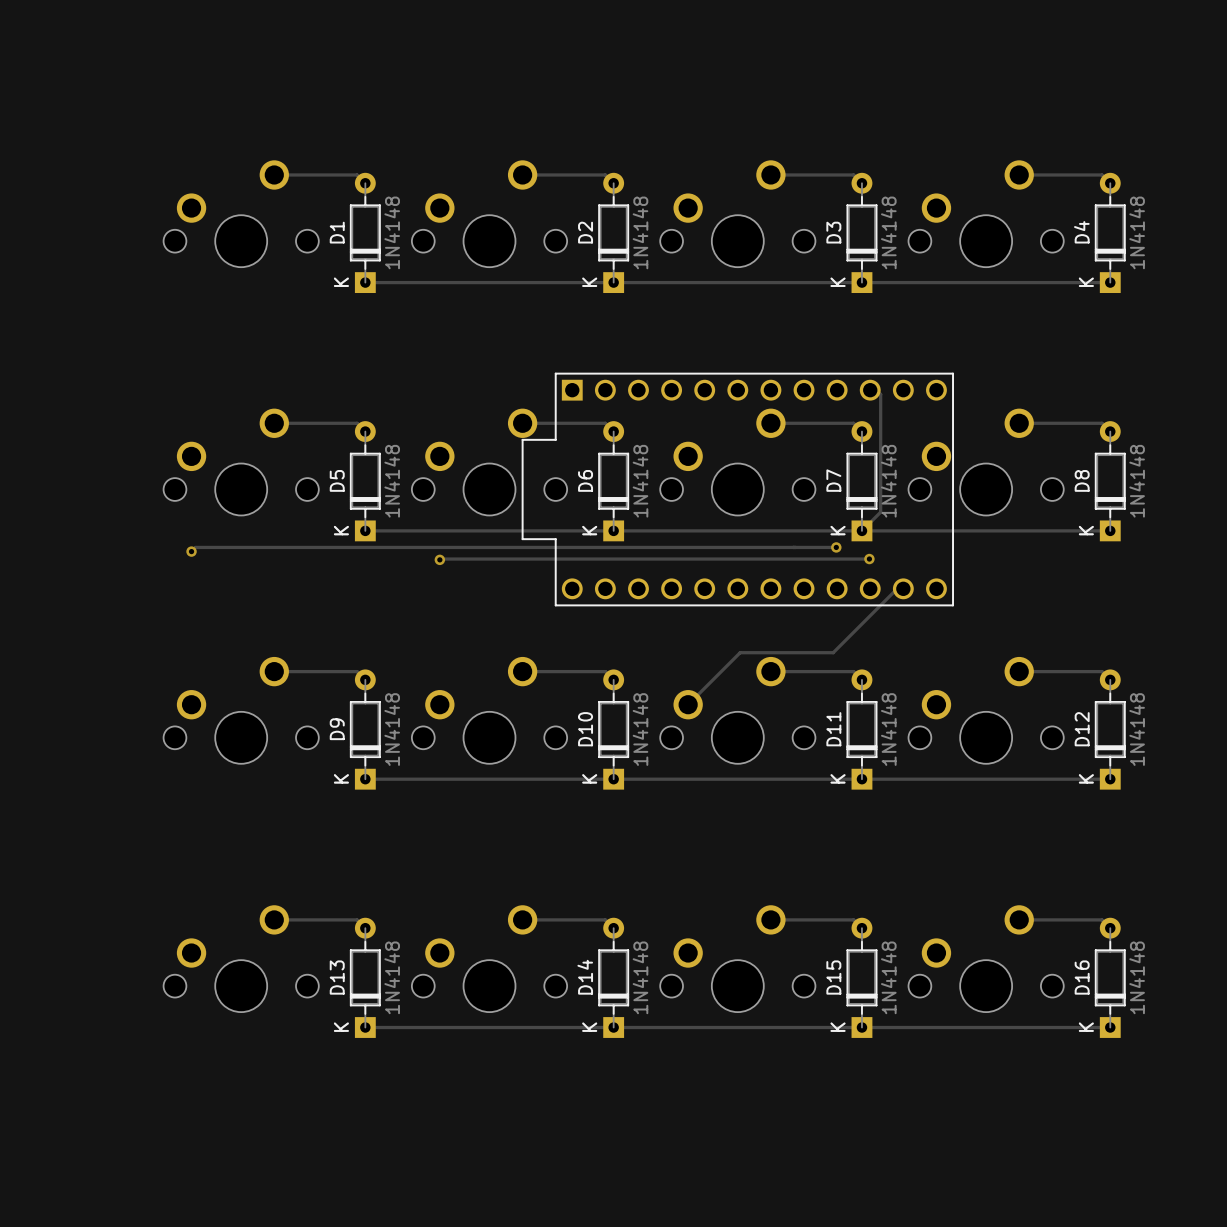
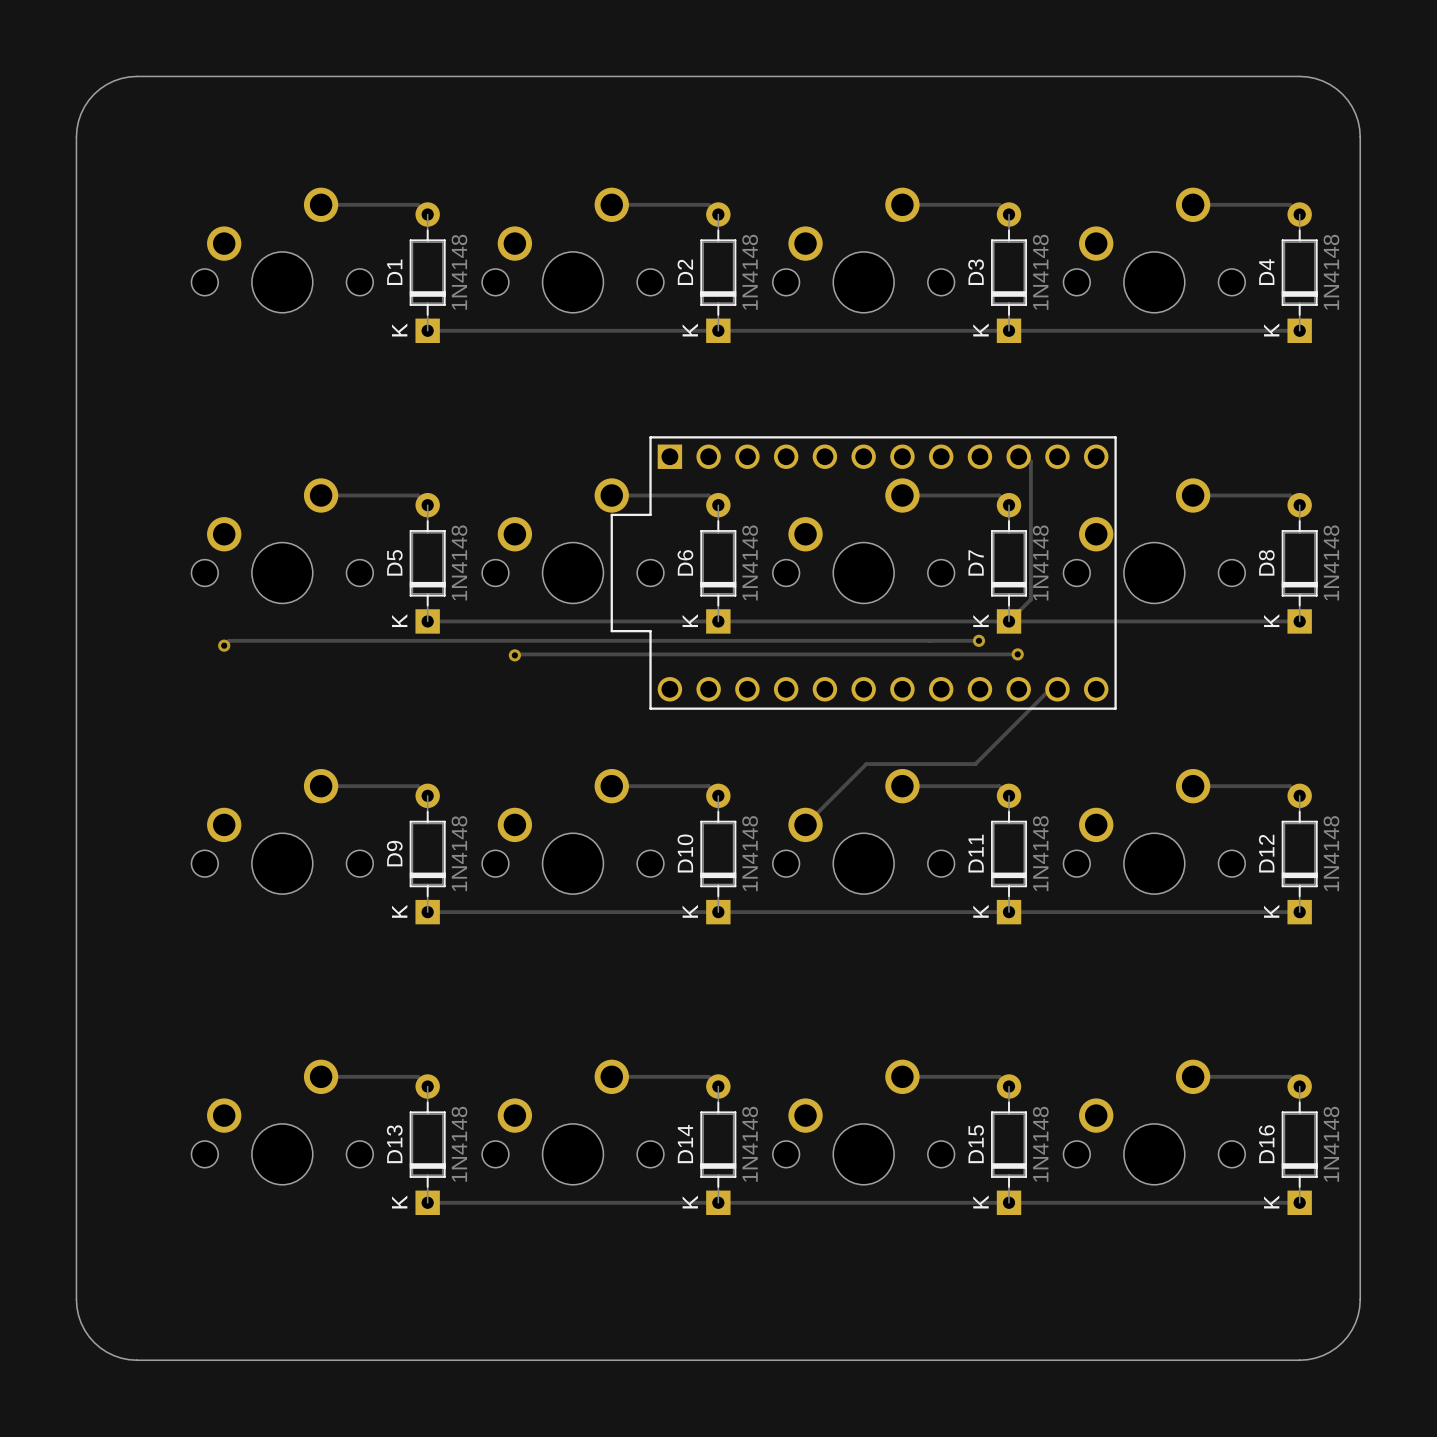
board edge: none -> (137, 76) (1299, 76) (1322, 81) (1342, 94) (1355, 113) (1360, 137) (1360, 1299) (1355, 1322) (1342, 1342) (1322, 1355) (1299, 1360) (137, 1360) (113, 1355) (94, 1342) (81, 1322) (76, 1299) (76, 137) (81, 113) (94, 94) (113, 81) (137, 76)

